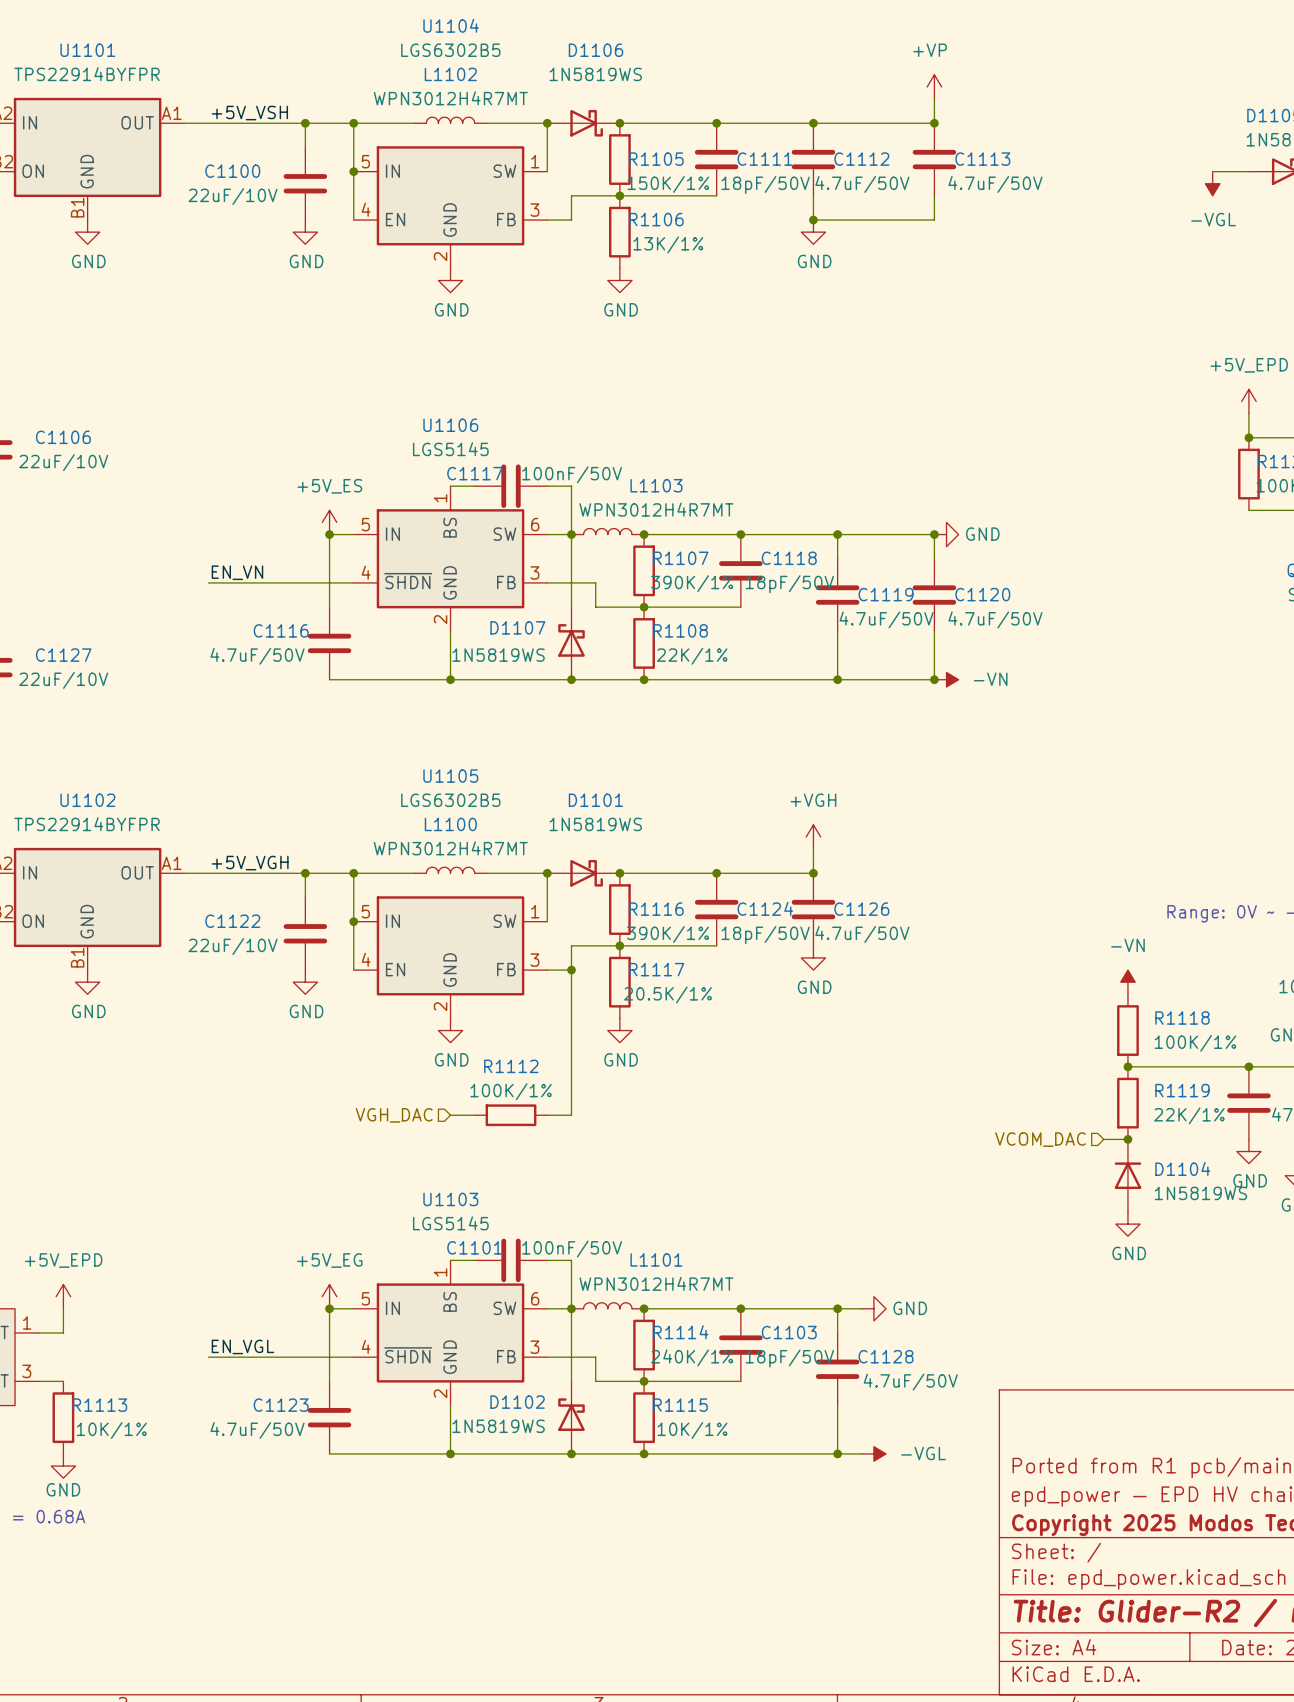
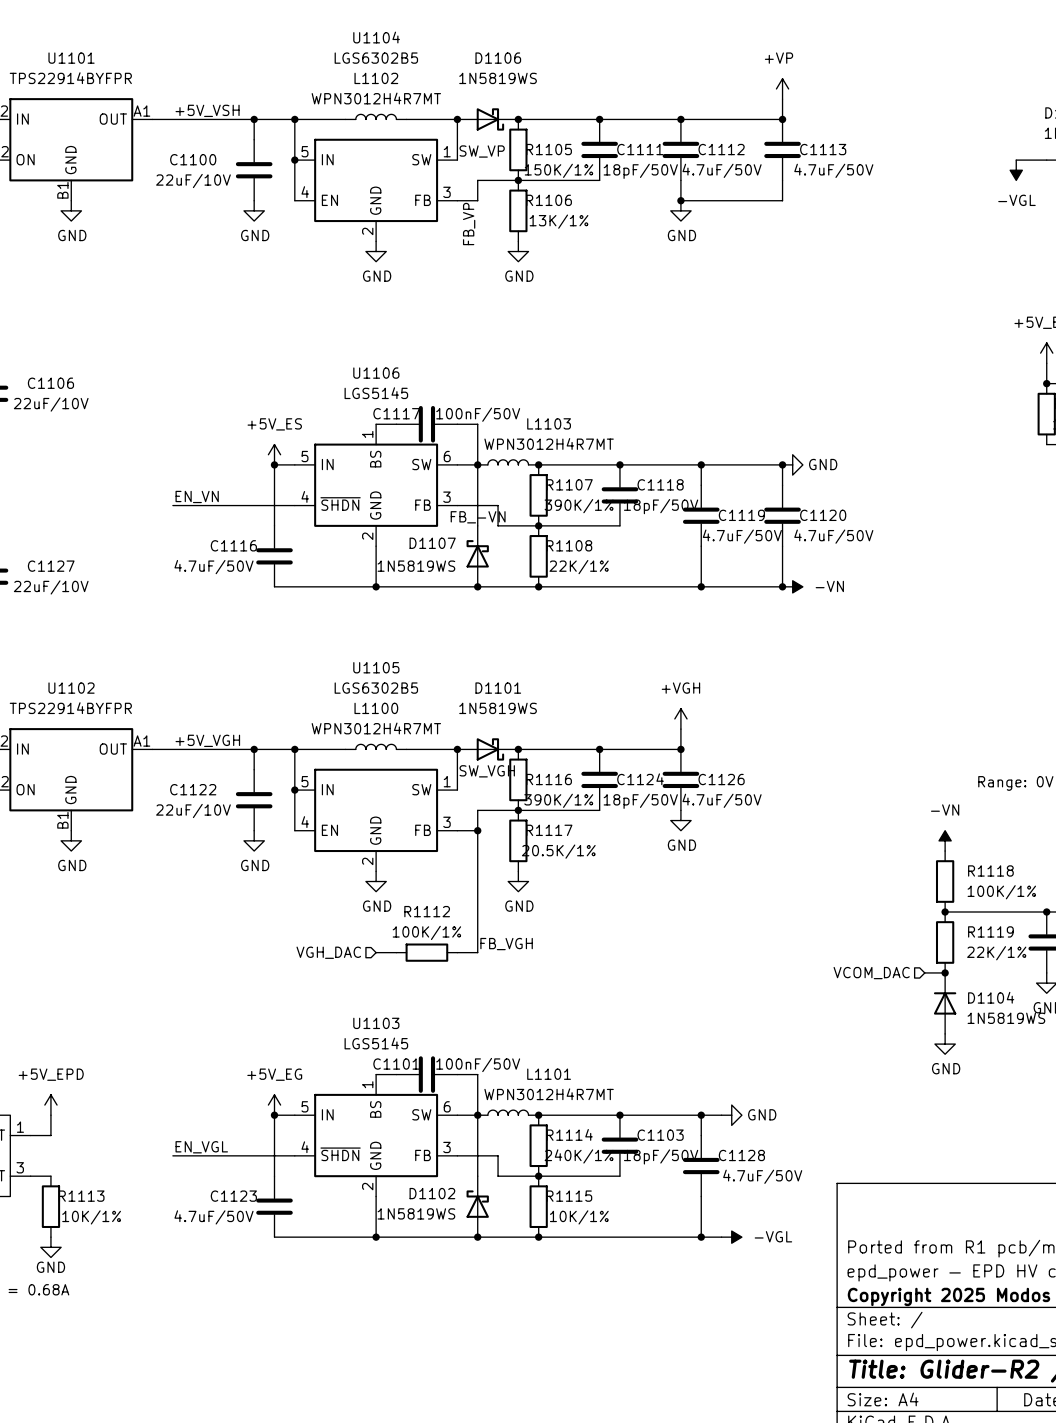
label: none -> SW_VP (482, 151)
label: none -> FB_VP (469, 224)
label: none -> FB_-VN (478, 517)
label: none -> SW_VGH (487, 771)
label: none -> FB_VGH (506, 944)

